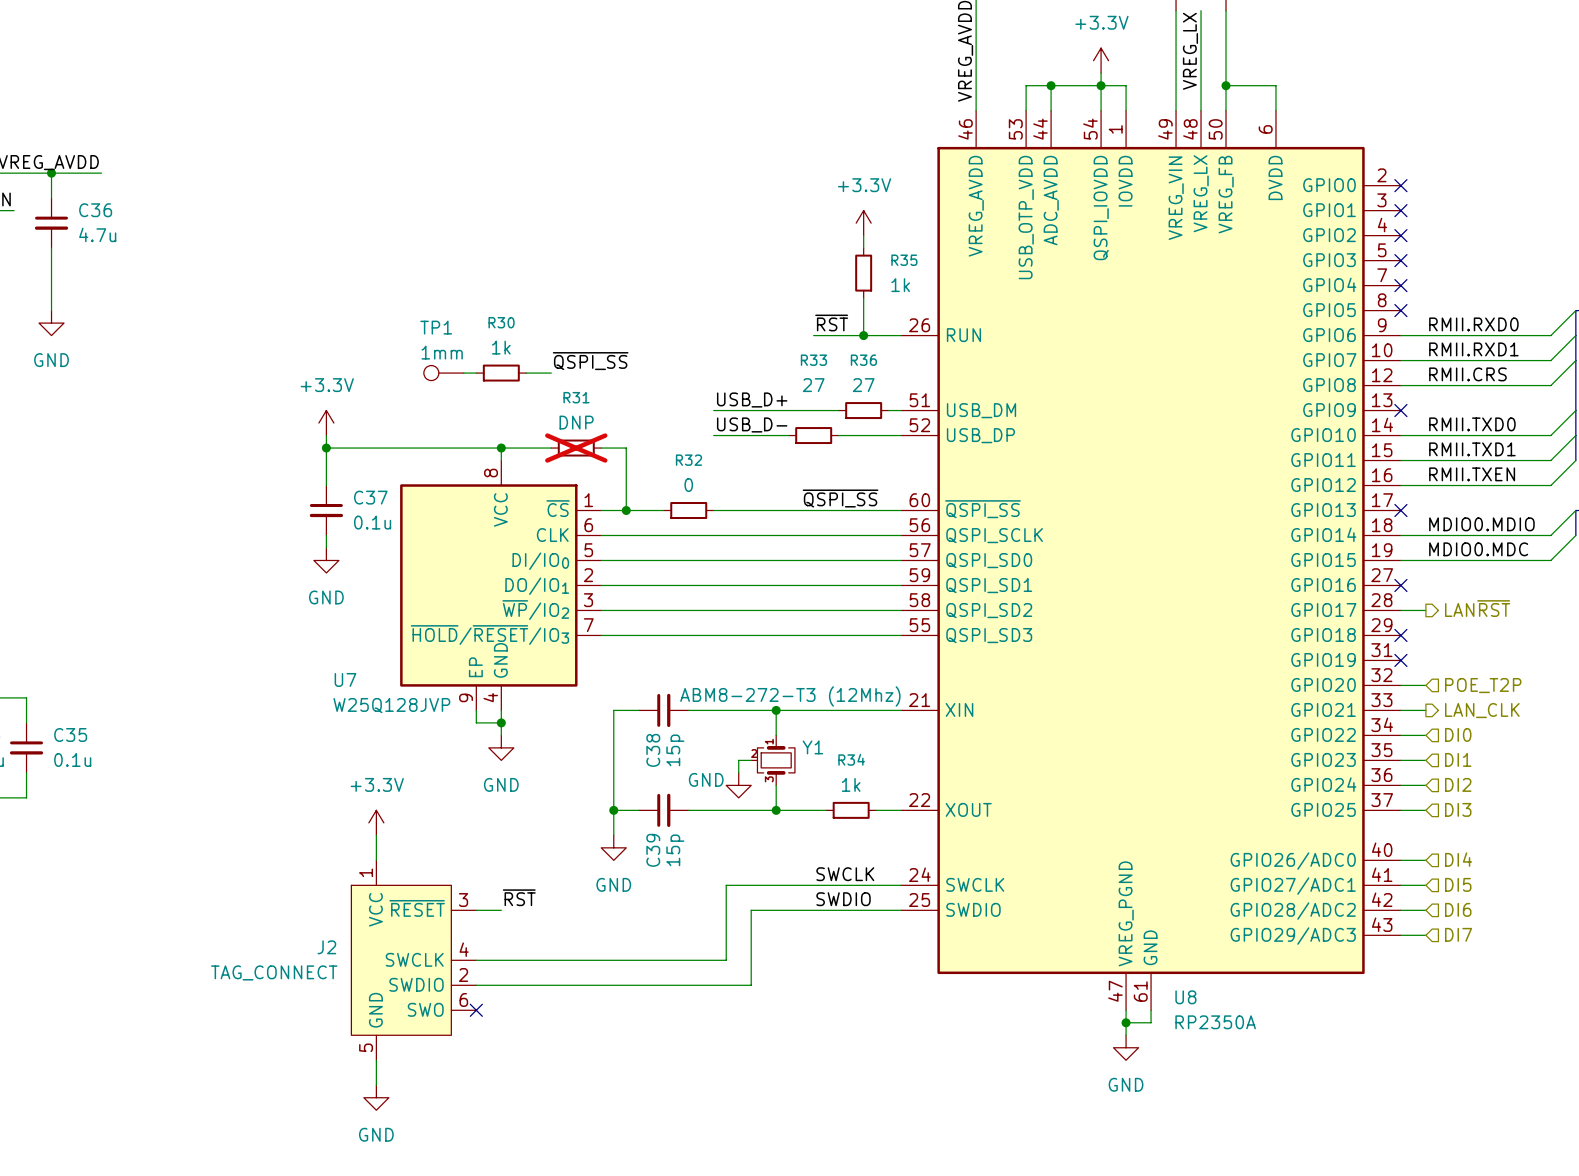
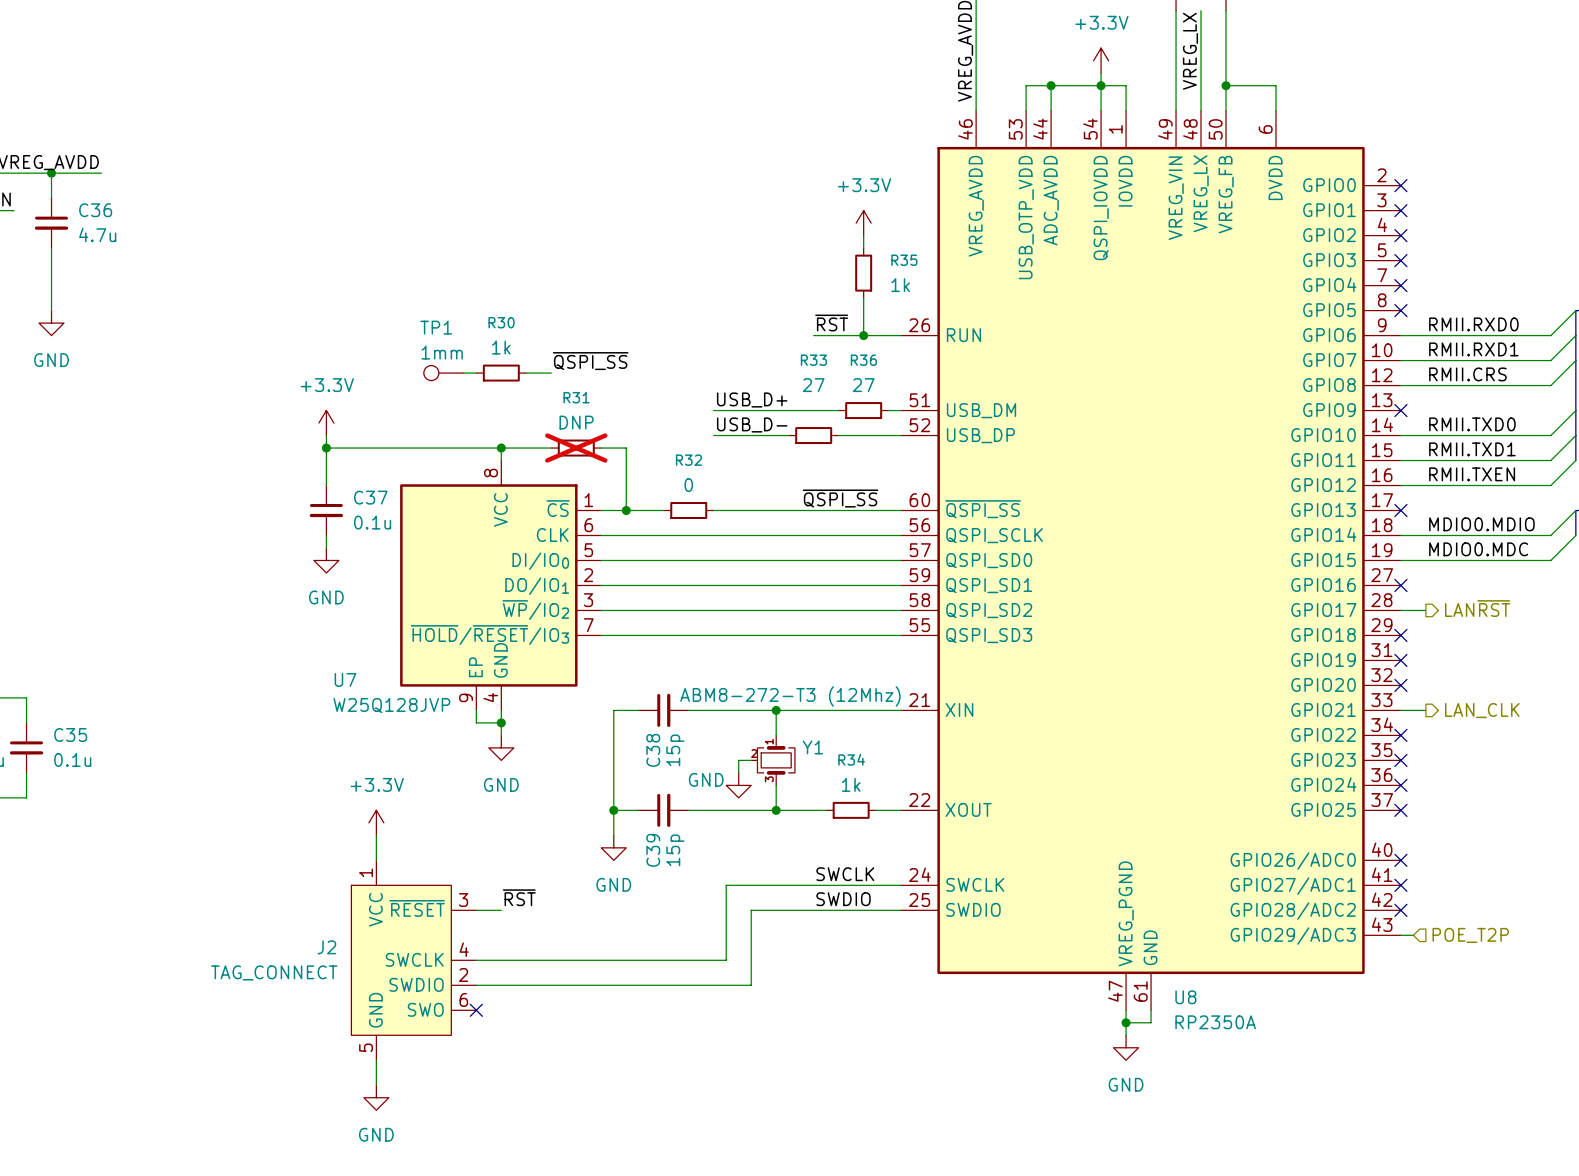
wire: (1400, 685) (1425, 685) -> none
no-connect mark: none -> (1400, 685)
hierarchical label: POE_T2P (1483, 685) -> none
hierarchical label: DI0 (1458, 734) -> none
wire: (1400, 735) (1425, 735) -> none
no-connect mark: none -> (1400, 735)
hierarchical label: DI1 (1458, 759) -> none
wire: (1400, 760) (1425, 760) -> none
no-connect mark: none -> (1400, 760)
hierarchical label: DI2 (1458, 784) -> none
wire: (1400, 785) (1425, 785) -> none
no-connect mark: none -> (1400, 785)
hierarchical label: DI3 (1458, 809) -> none
wire: (1400, 810) (1425, 810) -> none
no-connect mark: none -> (1400, 810)
hierarchical label: DI4 (1458, 859) -> none
wire: (1400, 860) (1425, 860) -> none
no-connect mark: none -> (1400, 860)
hierarchical label: DI5 (1458, 884) -> none
wire: (1400, 885) (1425, 885) -> none
no-connect mark: none -> (1400, 885)
hierarchical label: DI6 (1458, 909) -> none
wire: (1400, 910) (1425, 910) -> none
no-connect mark: none -> (1400, 910)
hierarchical label: DI7 (1458, 934) -> none
wire: (1413, 935) (1425, 935) -> none
hierarchical label: none -> POE_T2P (1470, 935)

